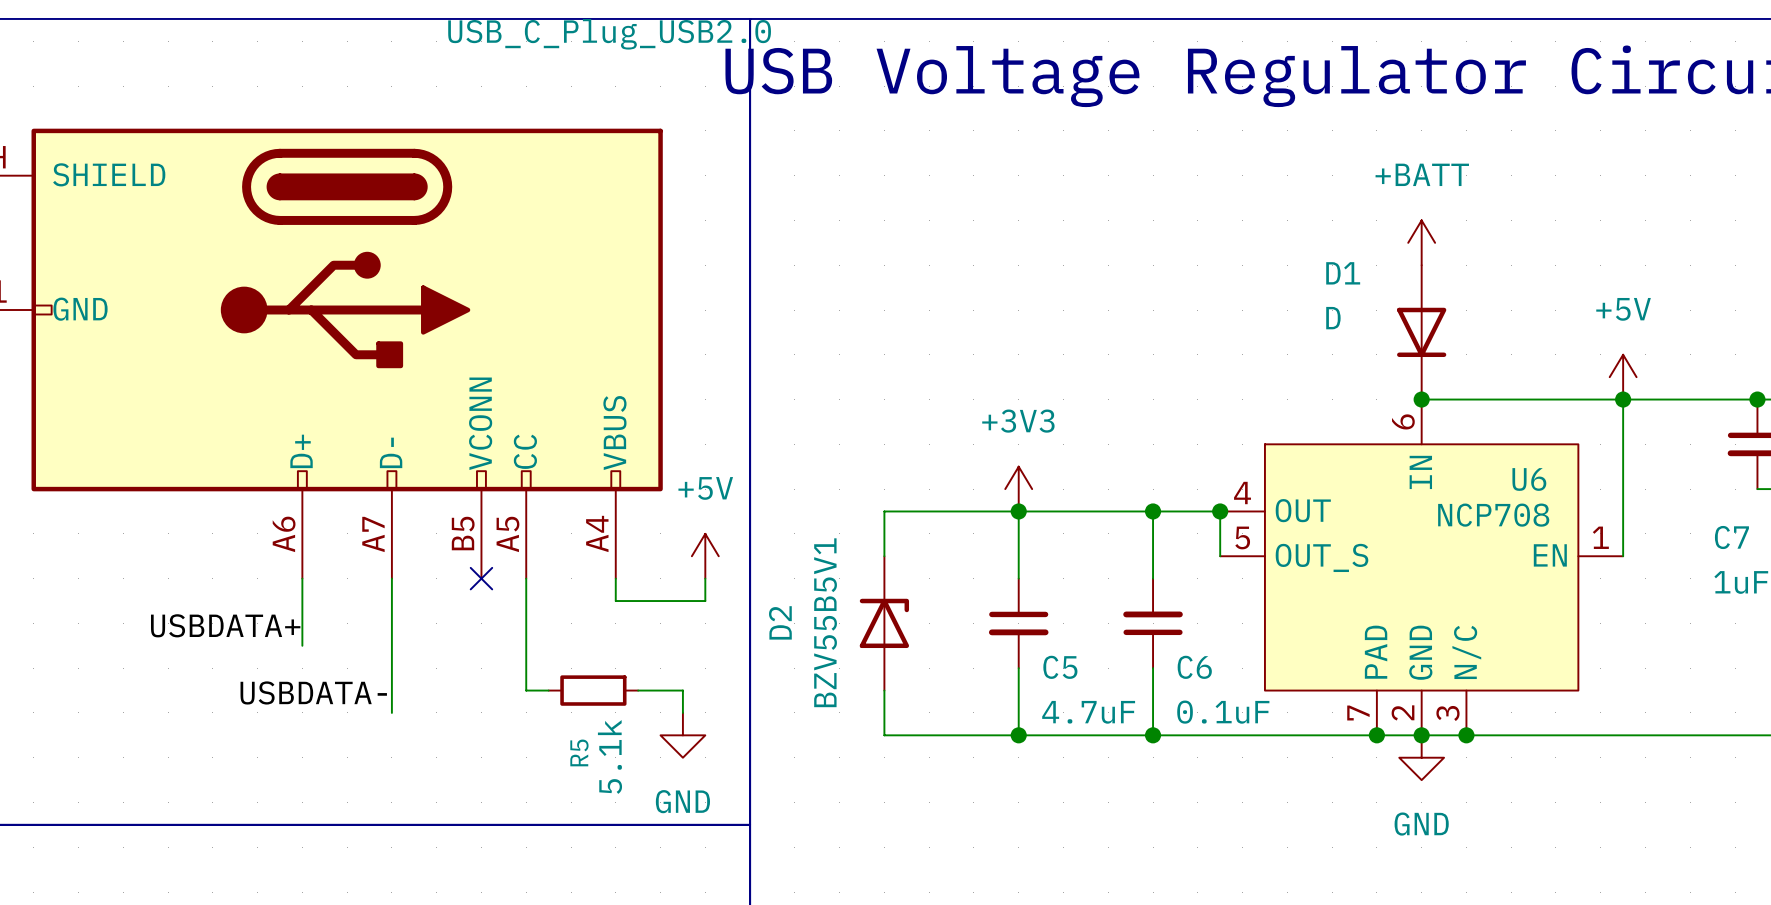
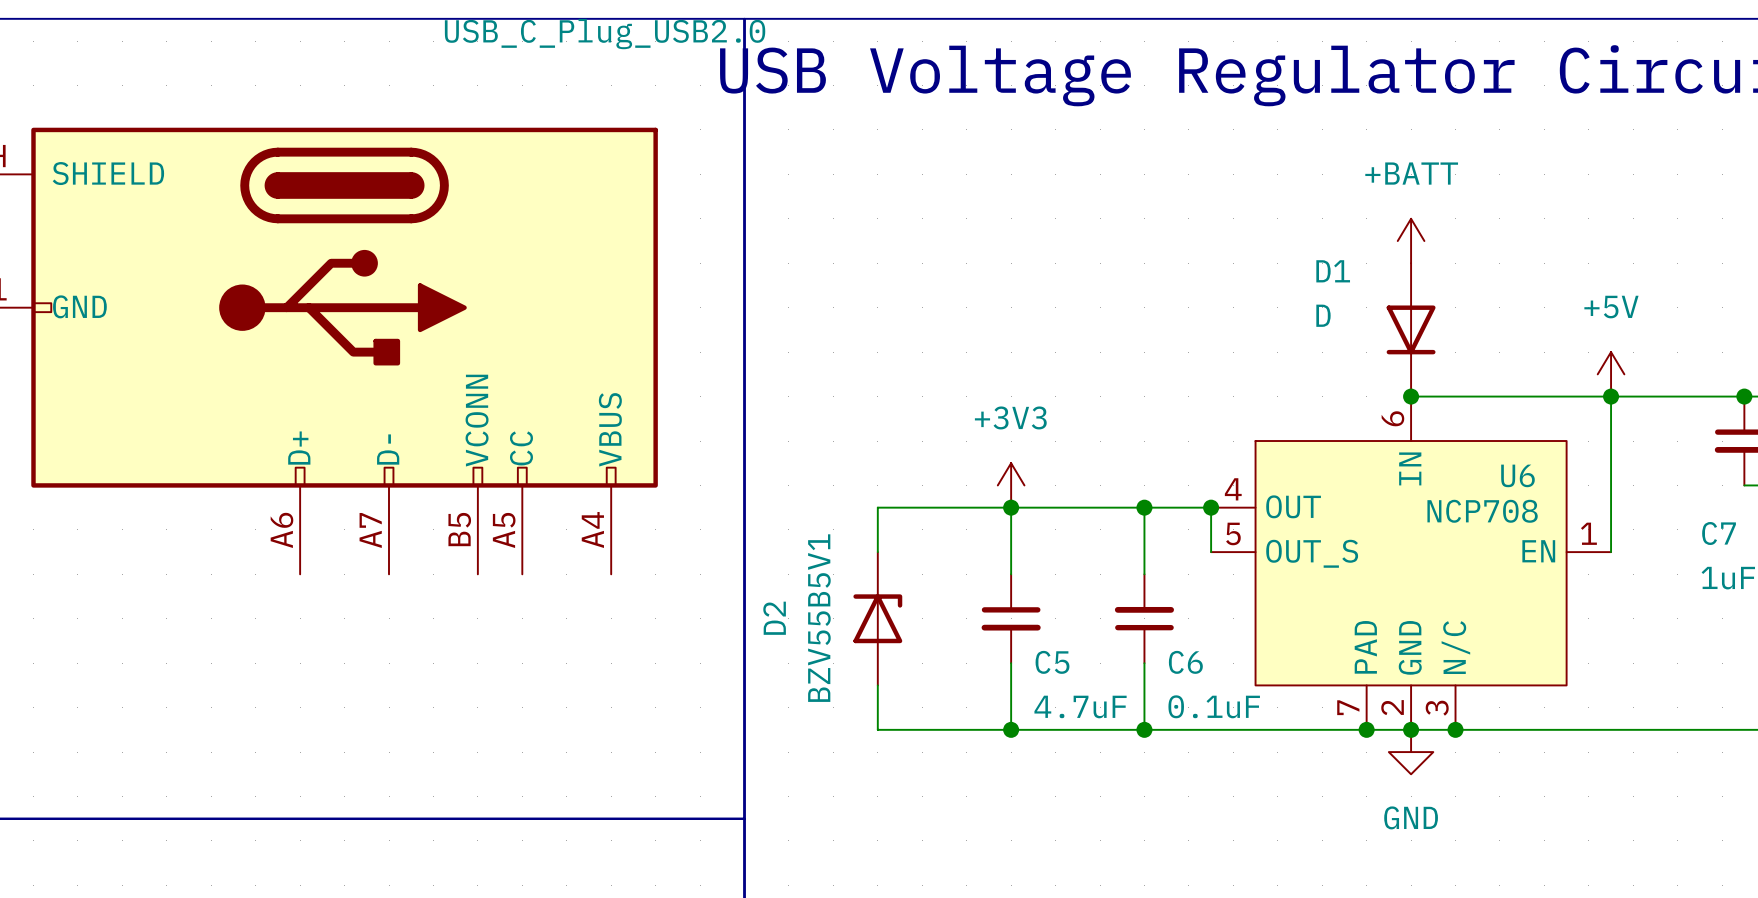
power symbol: +5V (705, 556) -> none
wire: (302, 578) (302, 645) -> none
wire: (391, 578) (391, 712) -> none
no-connect mark: (481, 578) -> none
wire: (526, 578) (526, 690) (548, 690) -> none
wire: (615, 578) (615, 601) (705, 601) (705, 578) -> none
label: USBDATA+ (225, 625) -> none
R5: 5.1k (593, 690) -> none
wire: (638, 690) (682, 690) (682, 712) -> none
label: USBDATA- (313, 692) -> none
power symbol: GND (682, 735) -> none

